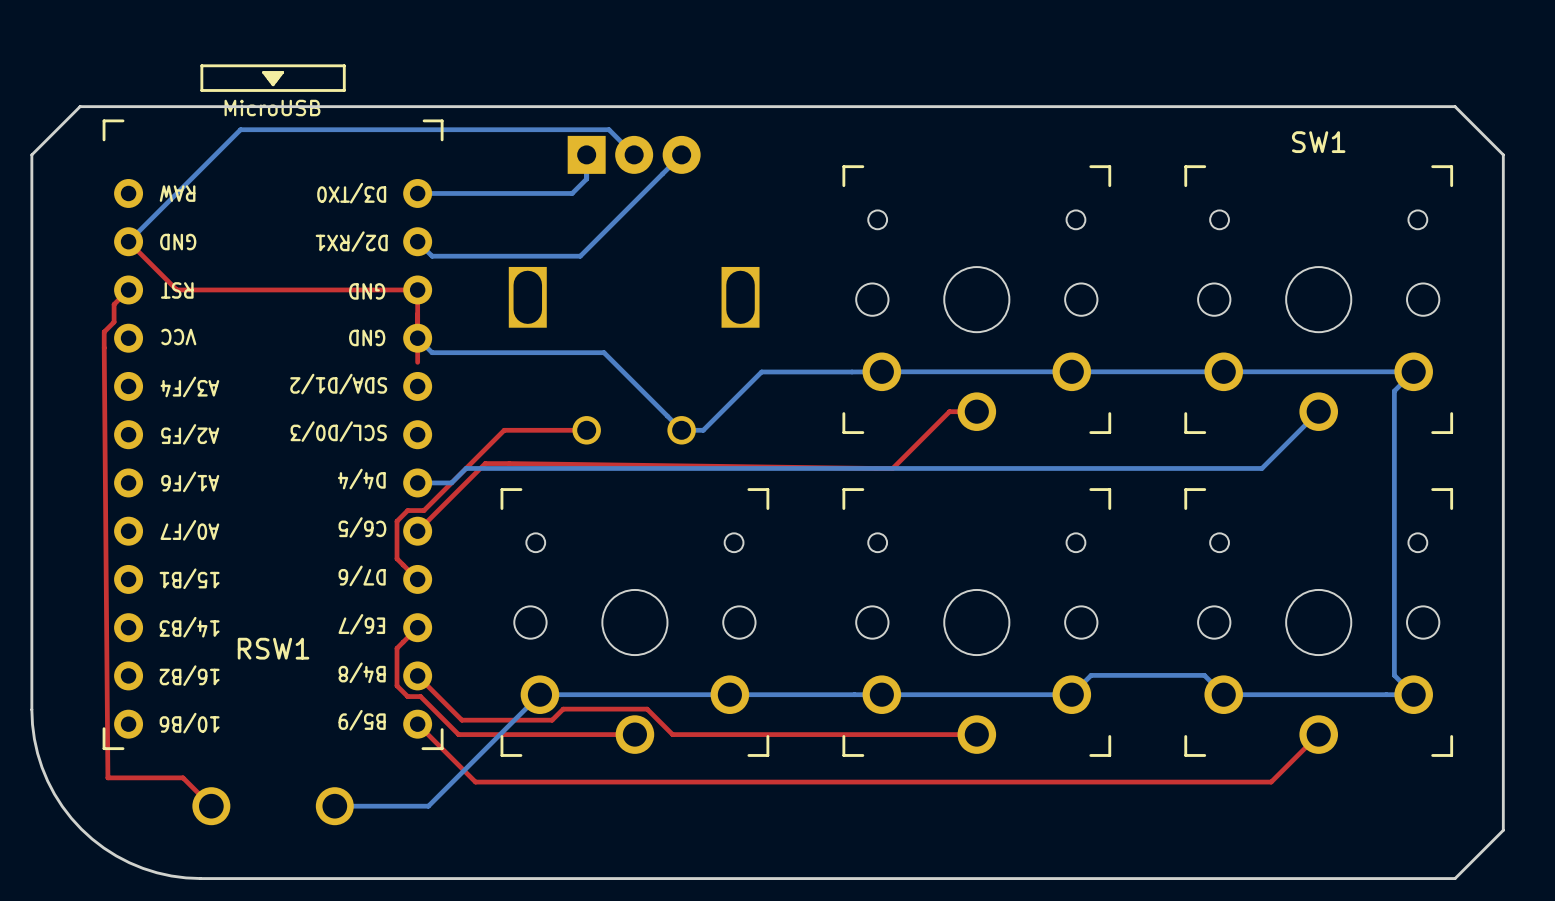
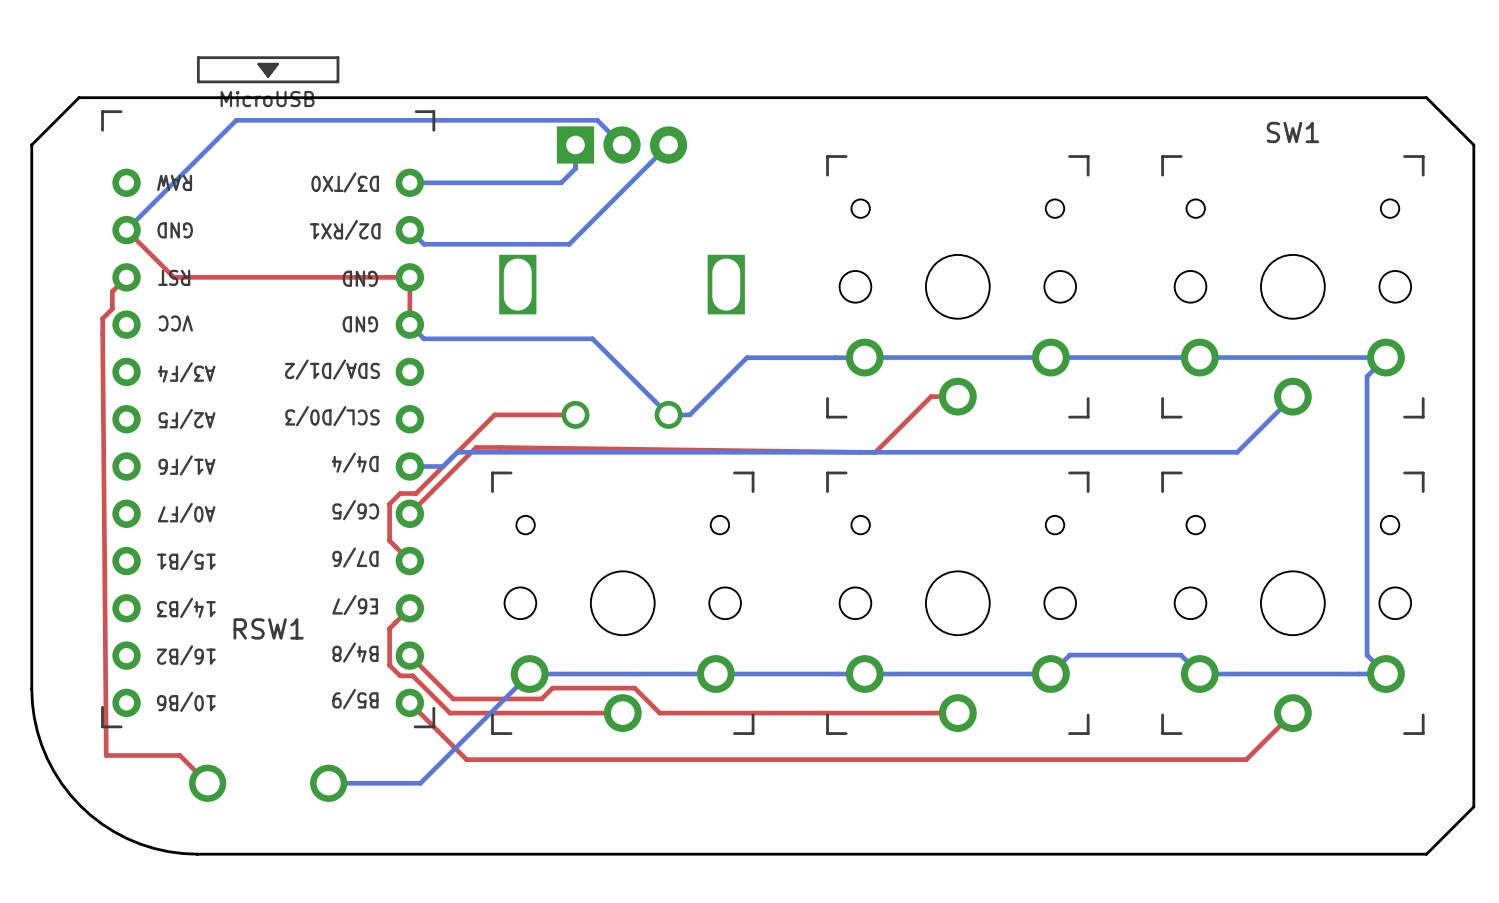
top track: (417, 338) (417, 362) -> none

